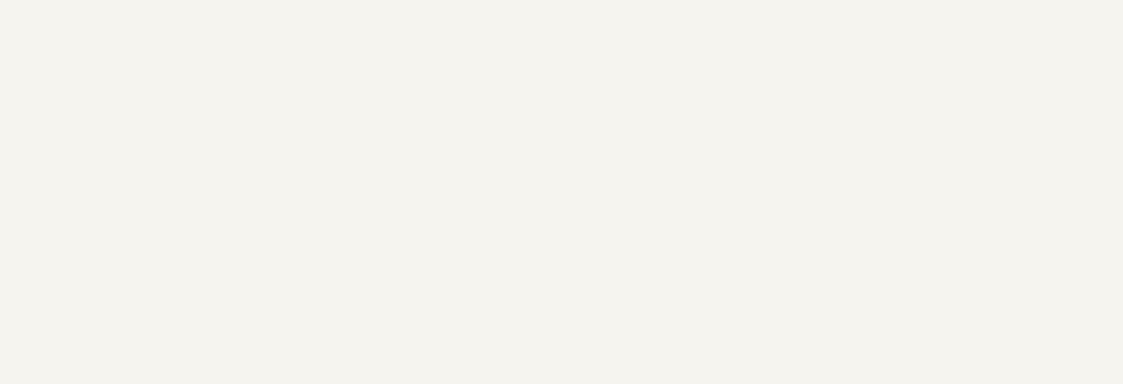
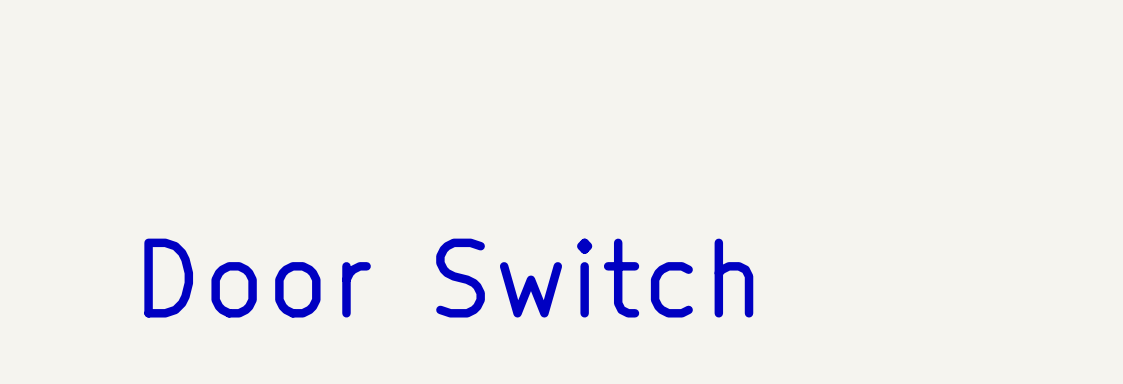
text: none -> Door Switch (448, 278)

